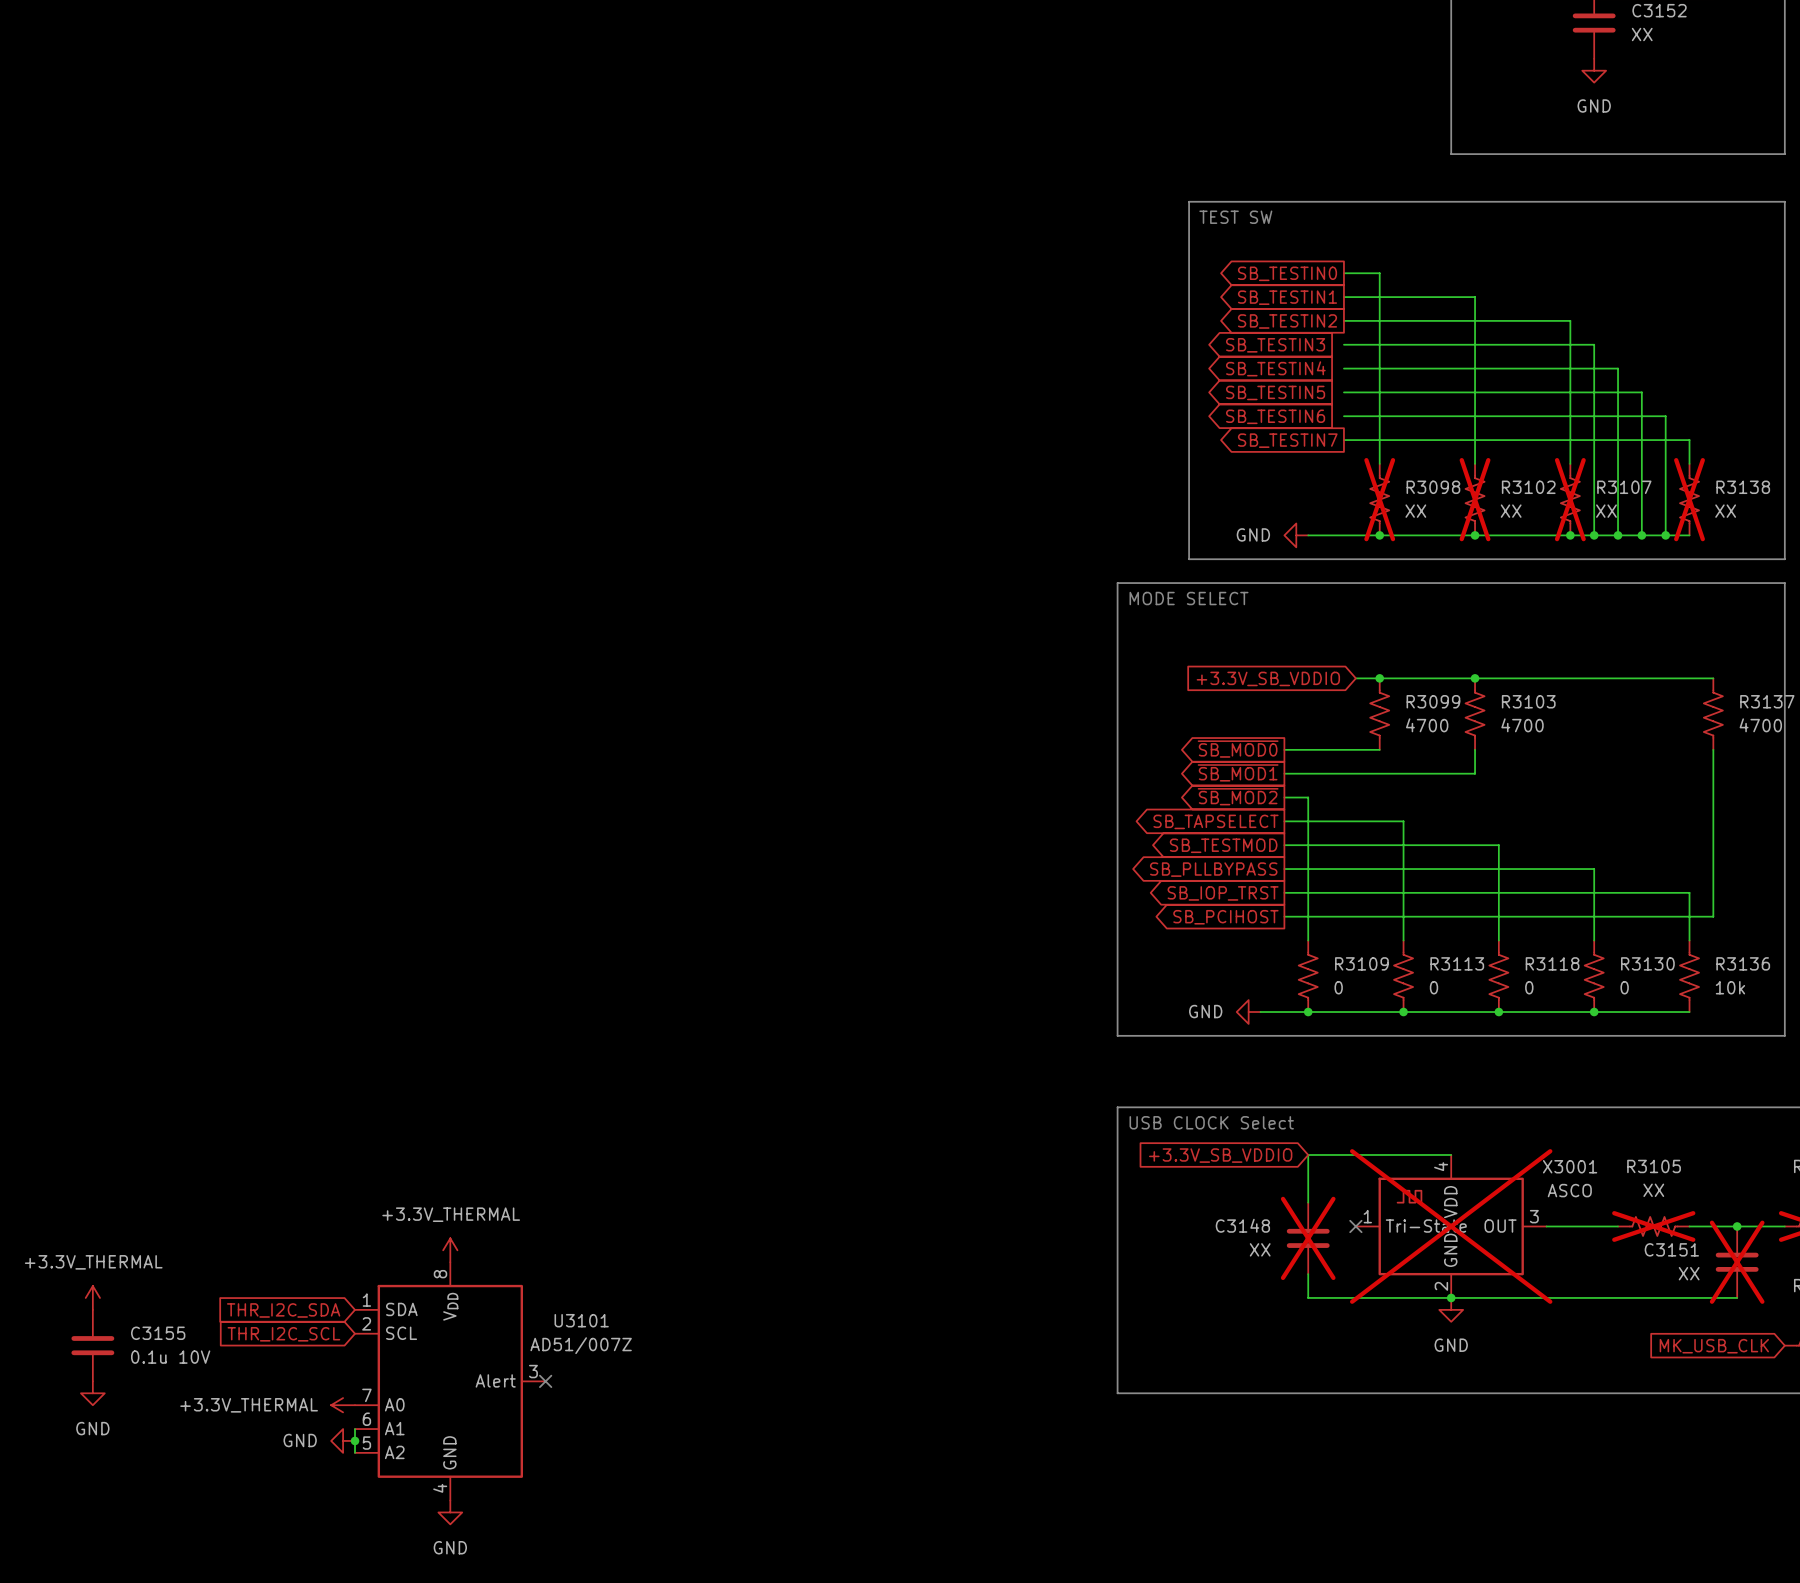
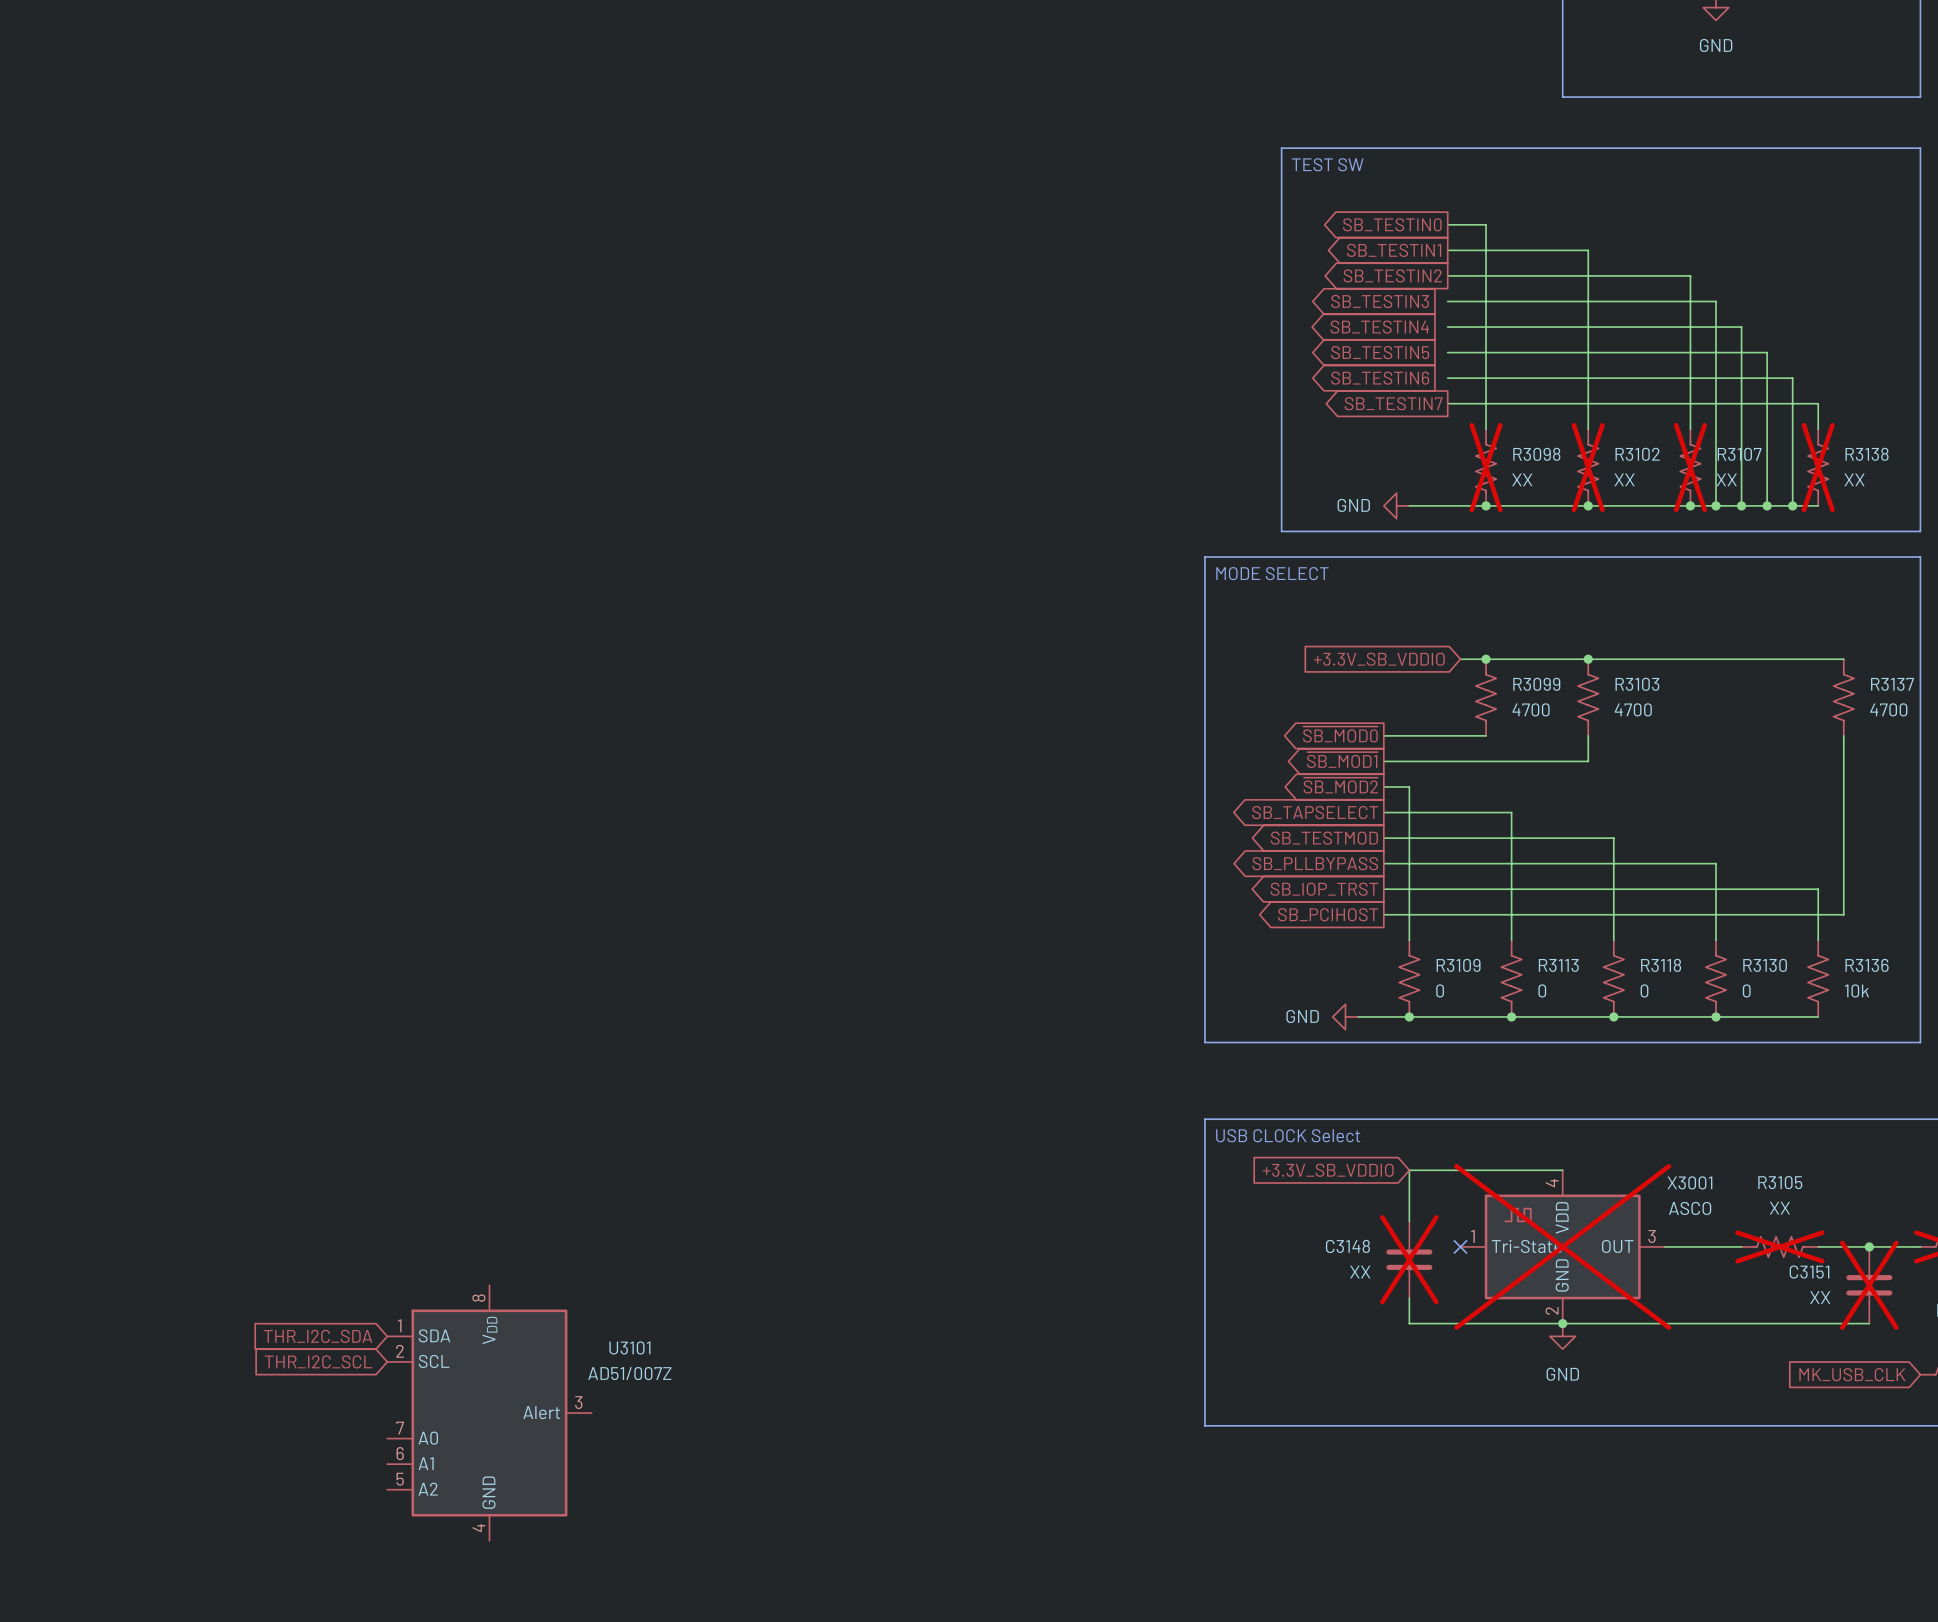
power symbol: +3.3V_THERMAL (450, 1250) -> none
power symbol: +3.3V_THERMAL (92, 1297) -> none
C3155: 0.1u 10V (92, 1345) -> none
no-connect mark: (545, 1381) -> none
power symbol: GND (92, 1393) -> none
power symbol: +3.3V_THERMAL (343, 1405) -> none
wire: (355, 1429) (355, 1452) -> none
power symbol: GND (343, 1440) -> none
junction: (355, 1440) -> none
power symbol: GND (450, 1512) -> none

